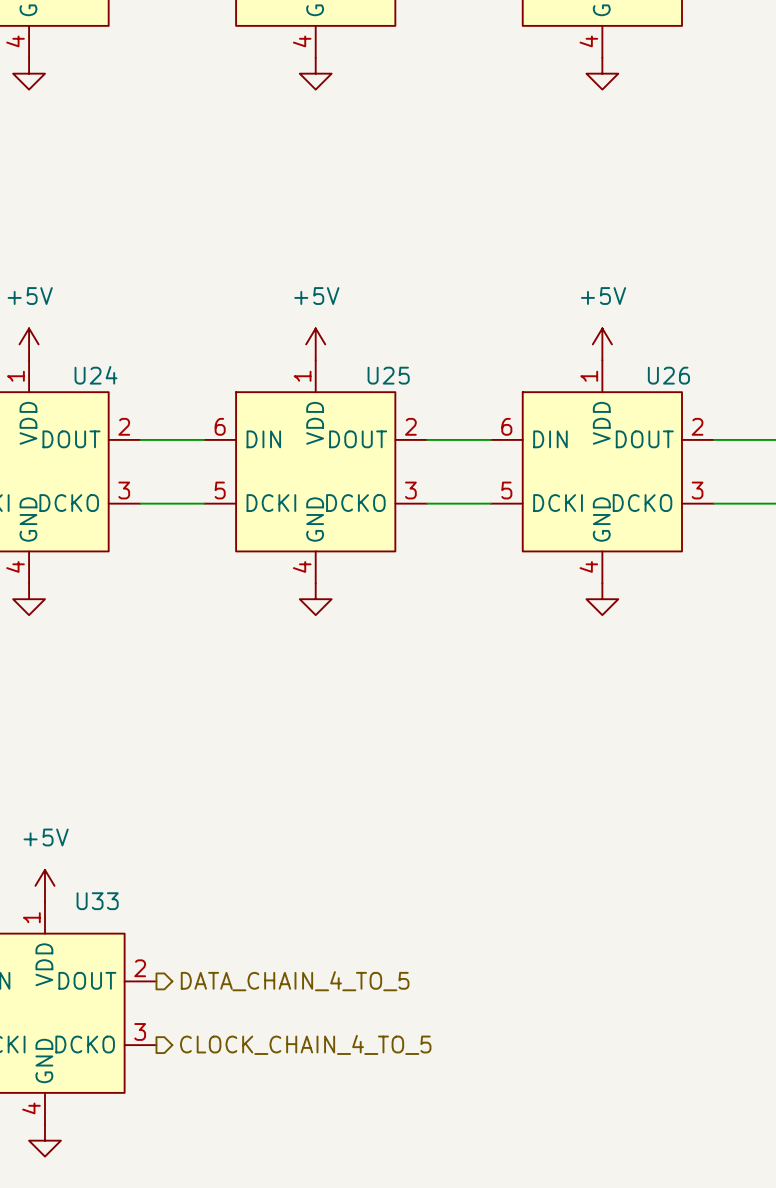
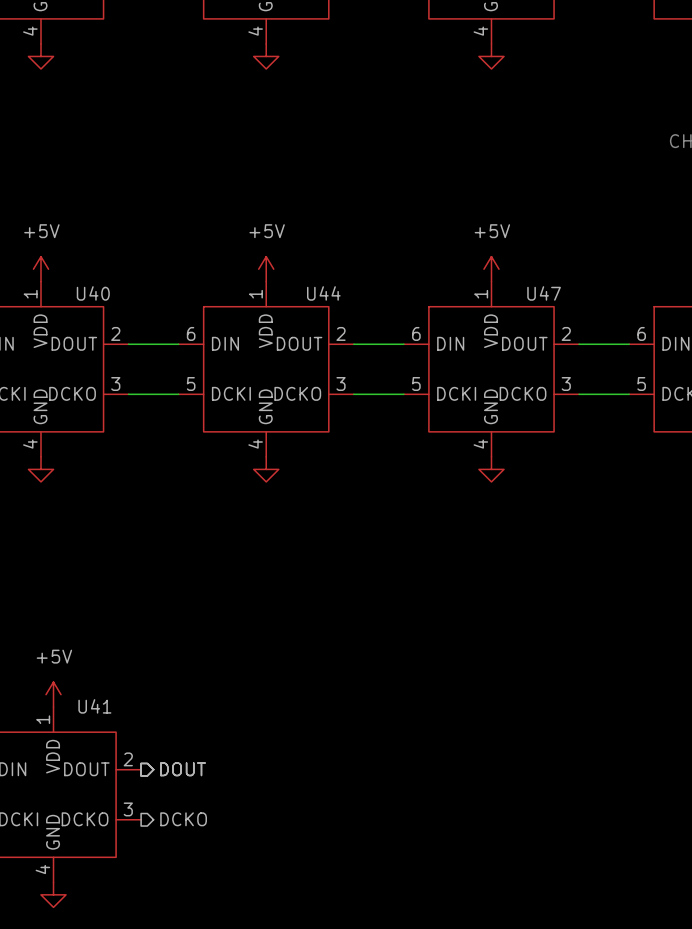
U24 name: U24 (95, 375) -> U40 (93, 293)
U25 name: U25 (388, 375) -> U44 (323, 293)
U26 name: U26 (668, 375) -> U47 (544, 293)
U33 name: U33 (97, 901) -> U41 (94, 706)
hierarchical label: DATA_CHAIN_4_TO_5 (295, 981) -> DOUT (183, 769)
hierarchical label: CLOCK_CHAIN_4_TO_5 (305, 1044) -> DCKO (183, 819)

